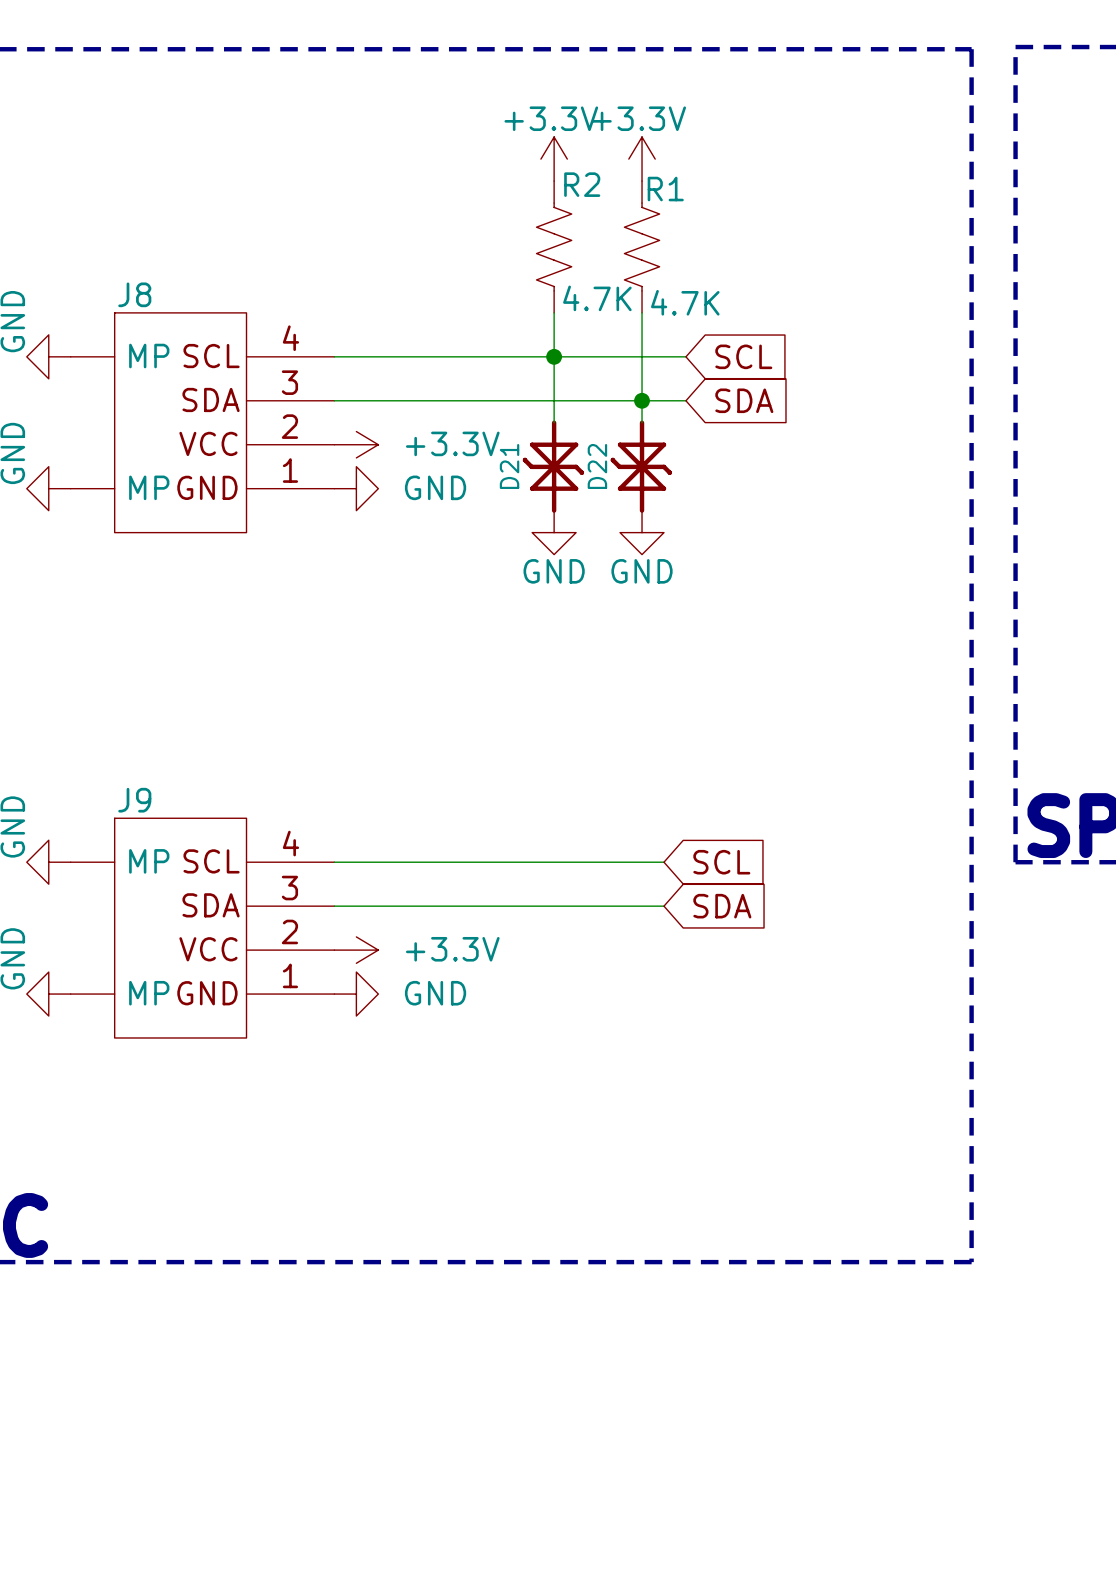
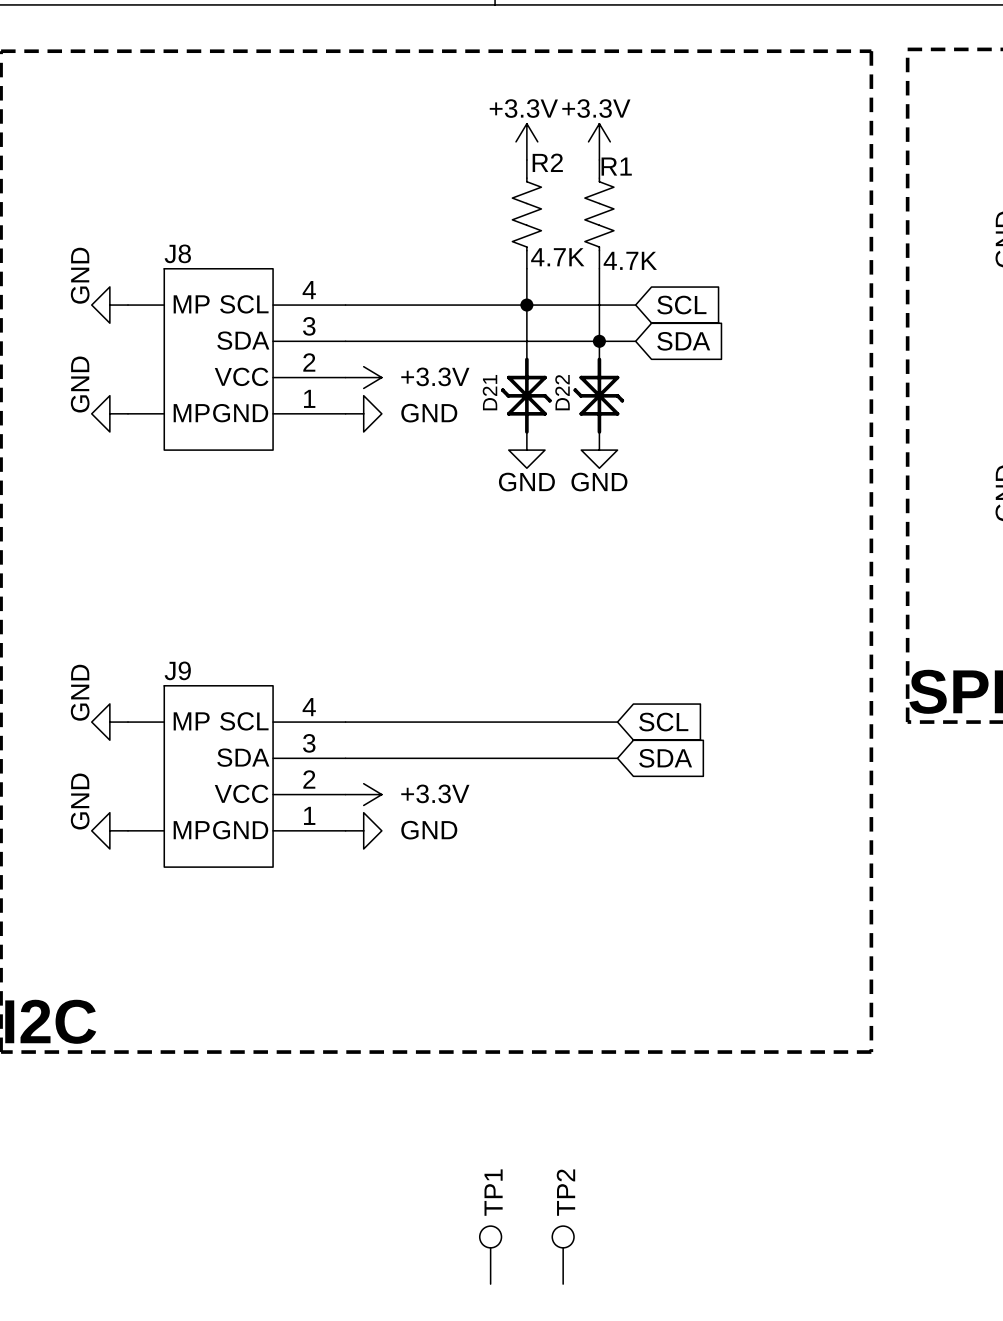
TP1: none -> (490, 1255)
TP2: none -> (563, 1255)

